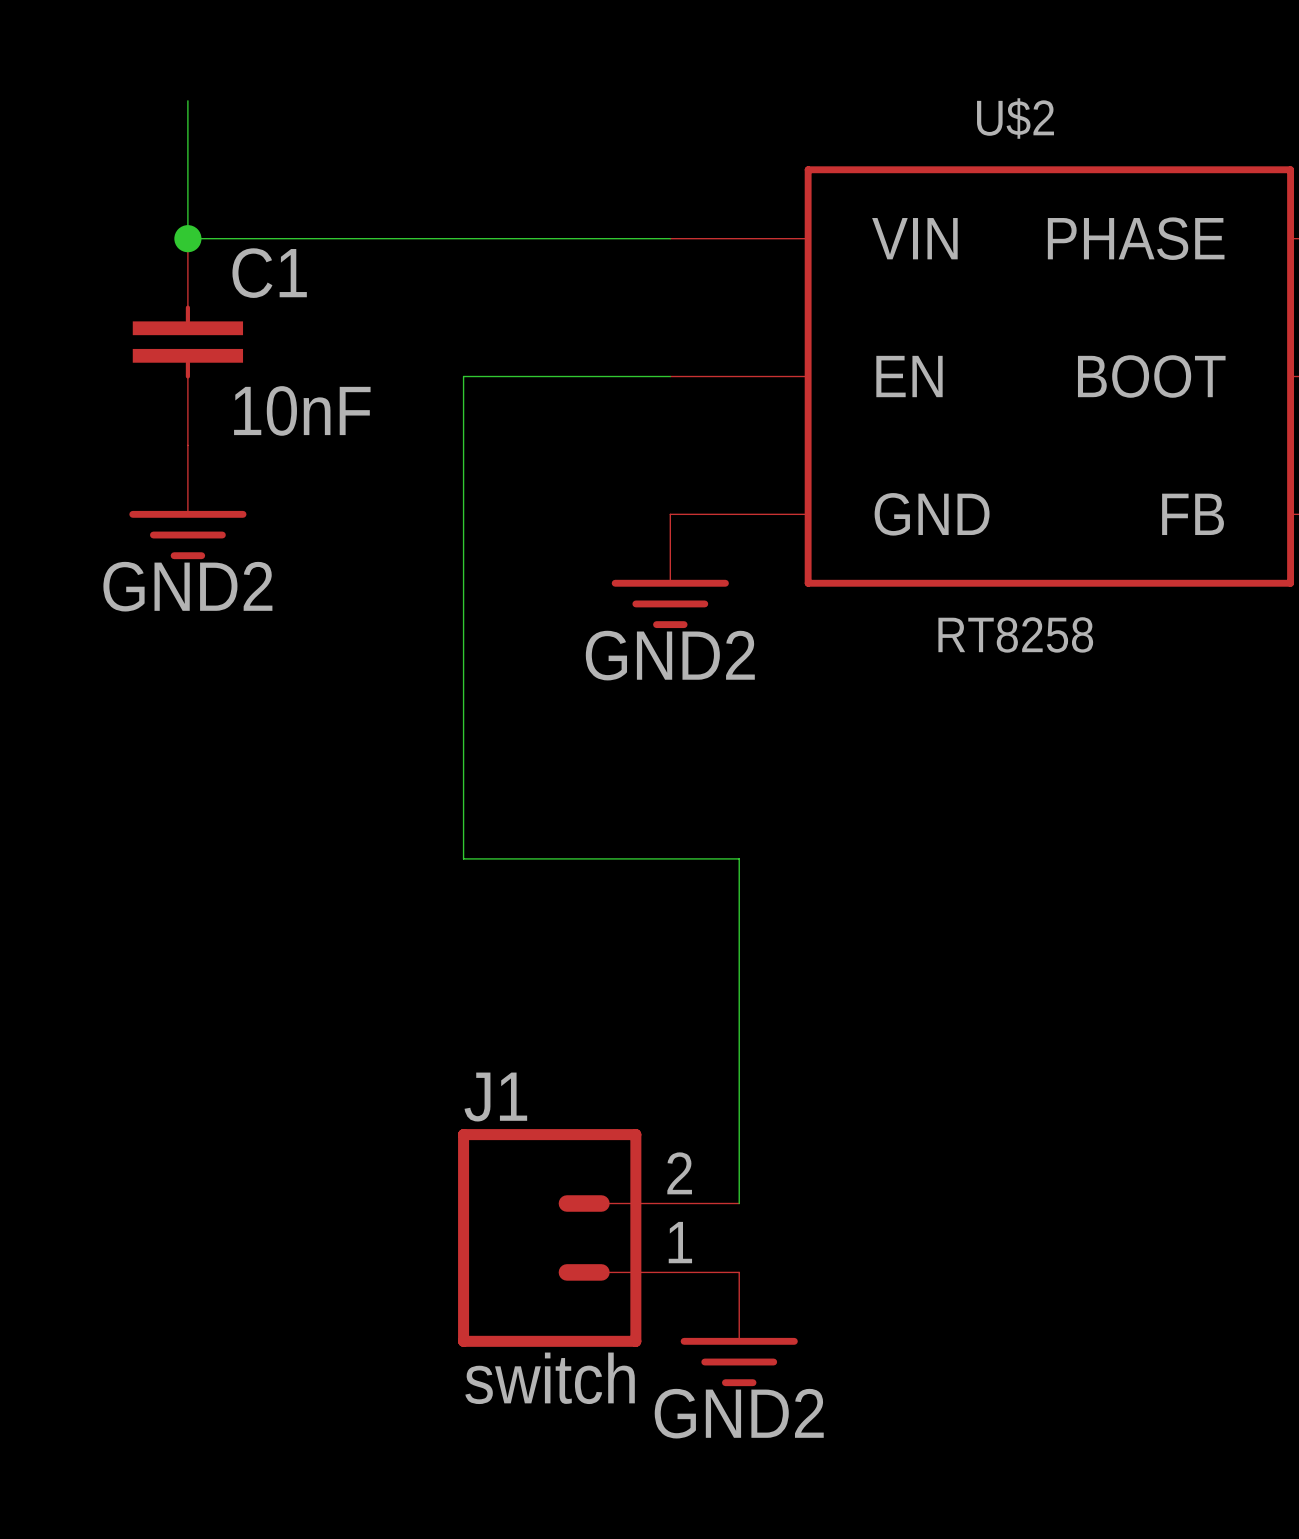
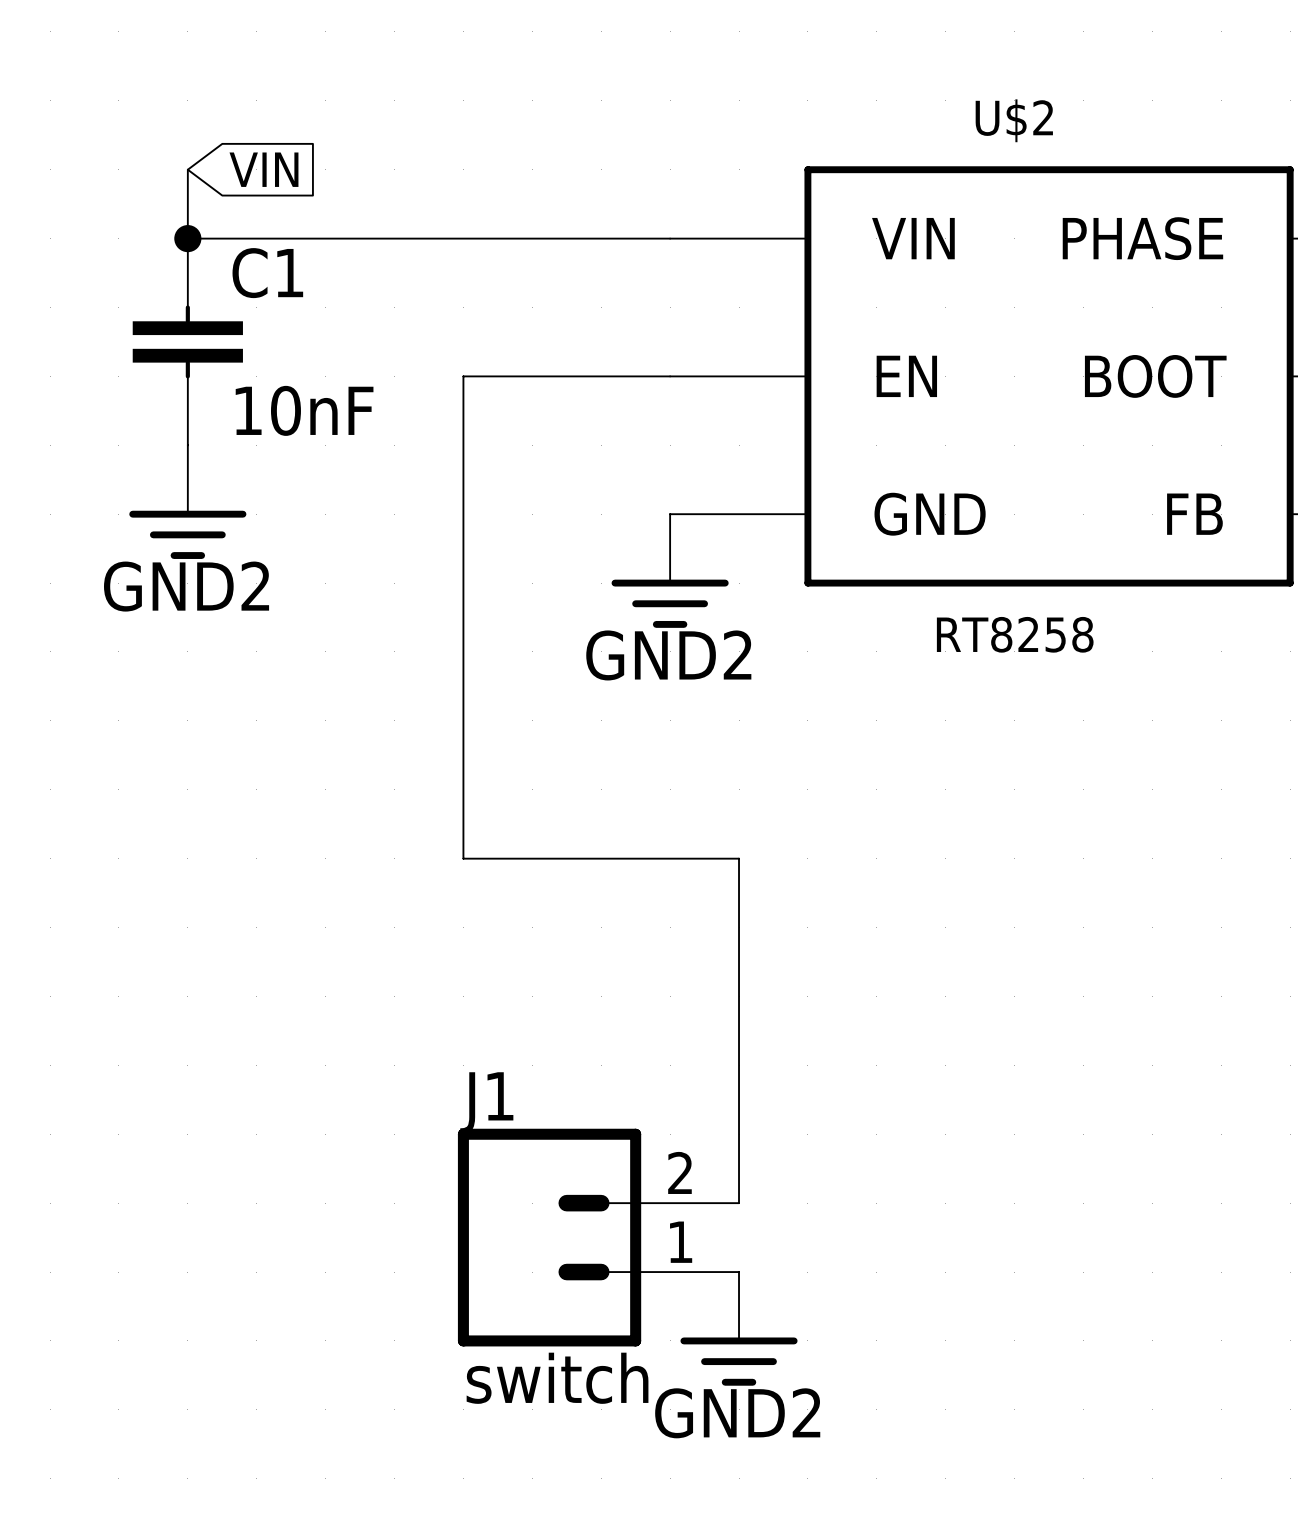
wire: (187, 100) (187, 169) -> none
global label: none -> VIN (263, 169)

